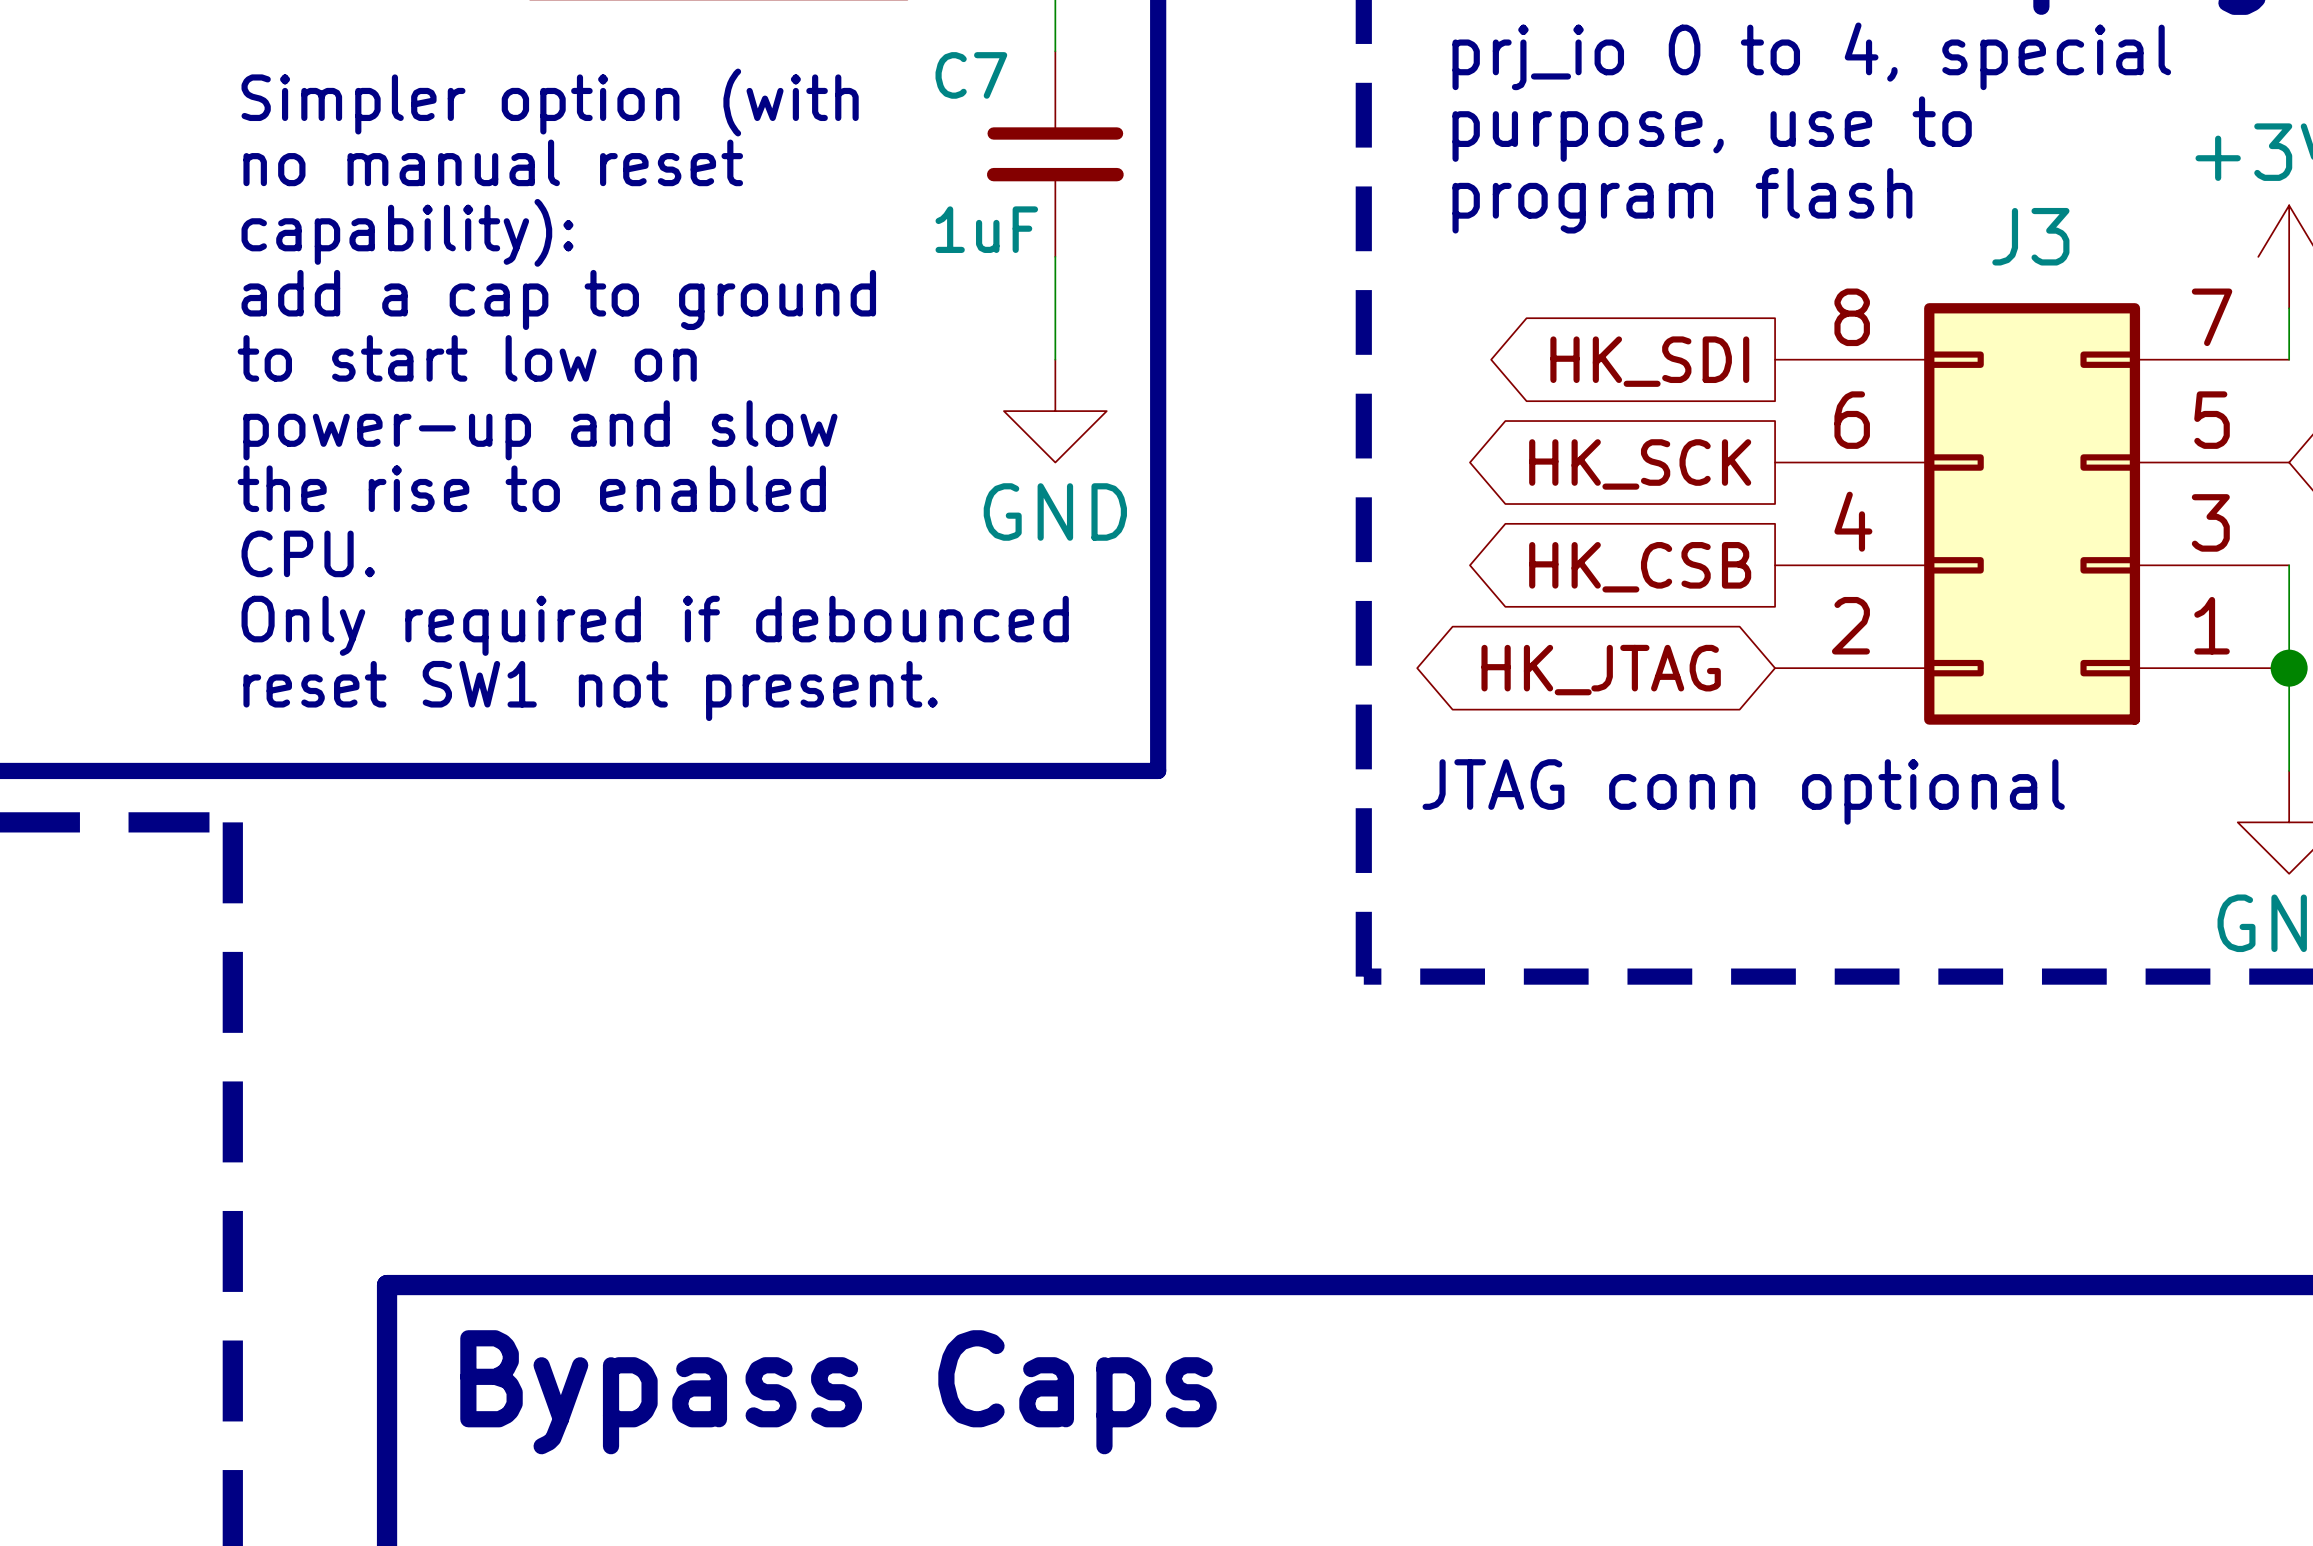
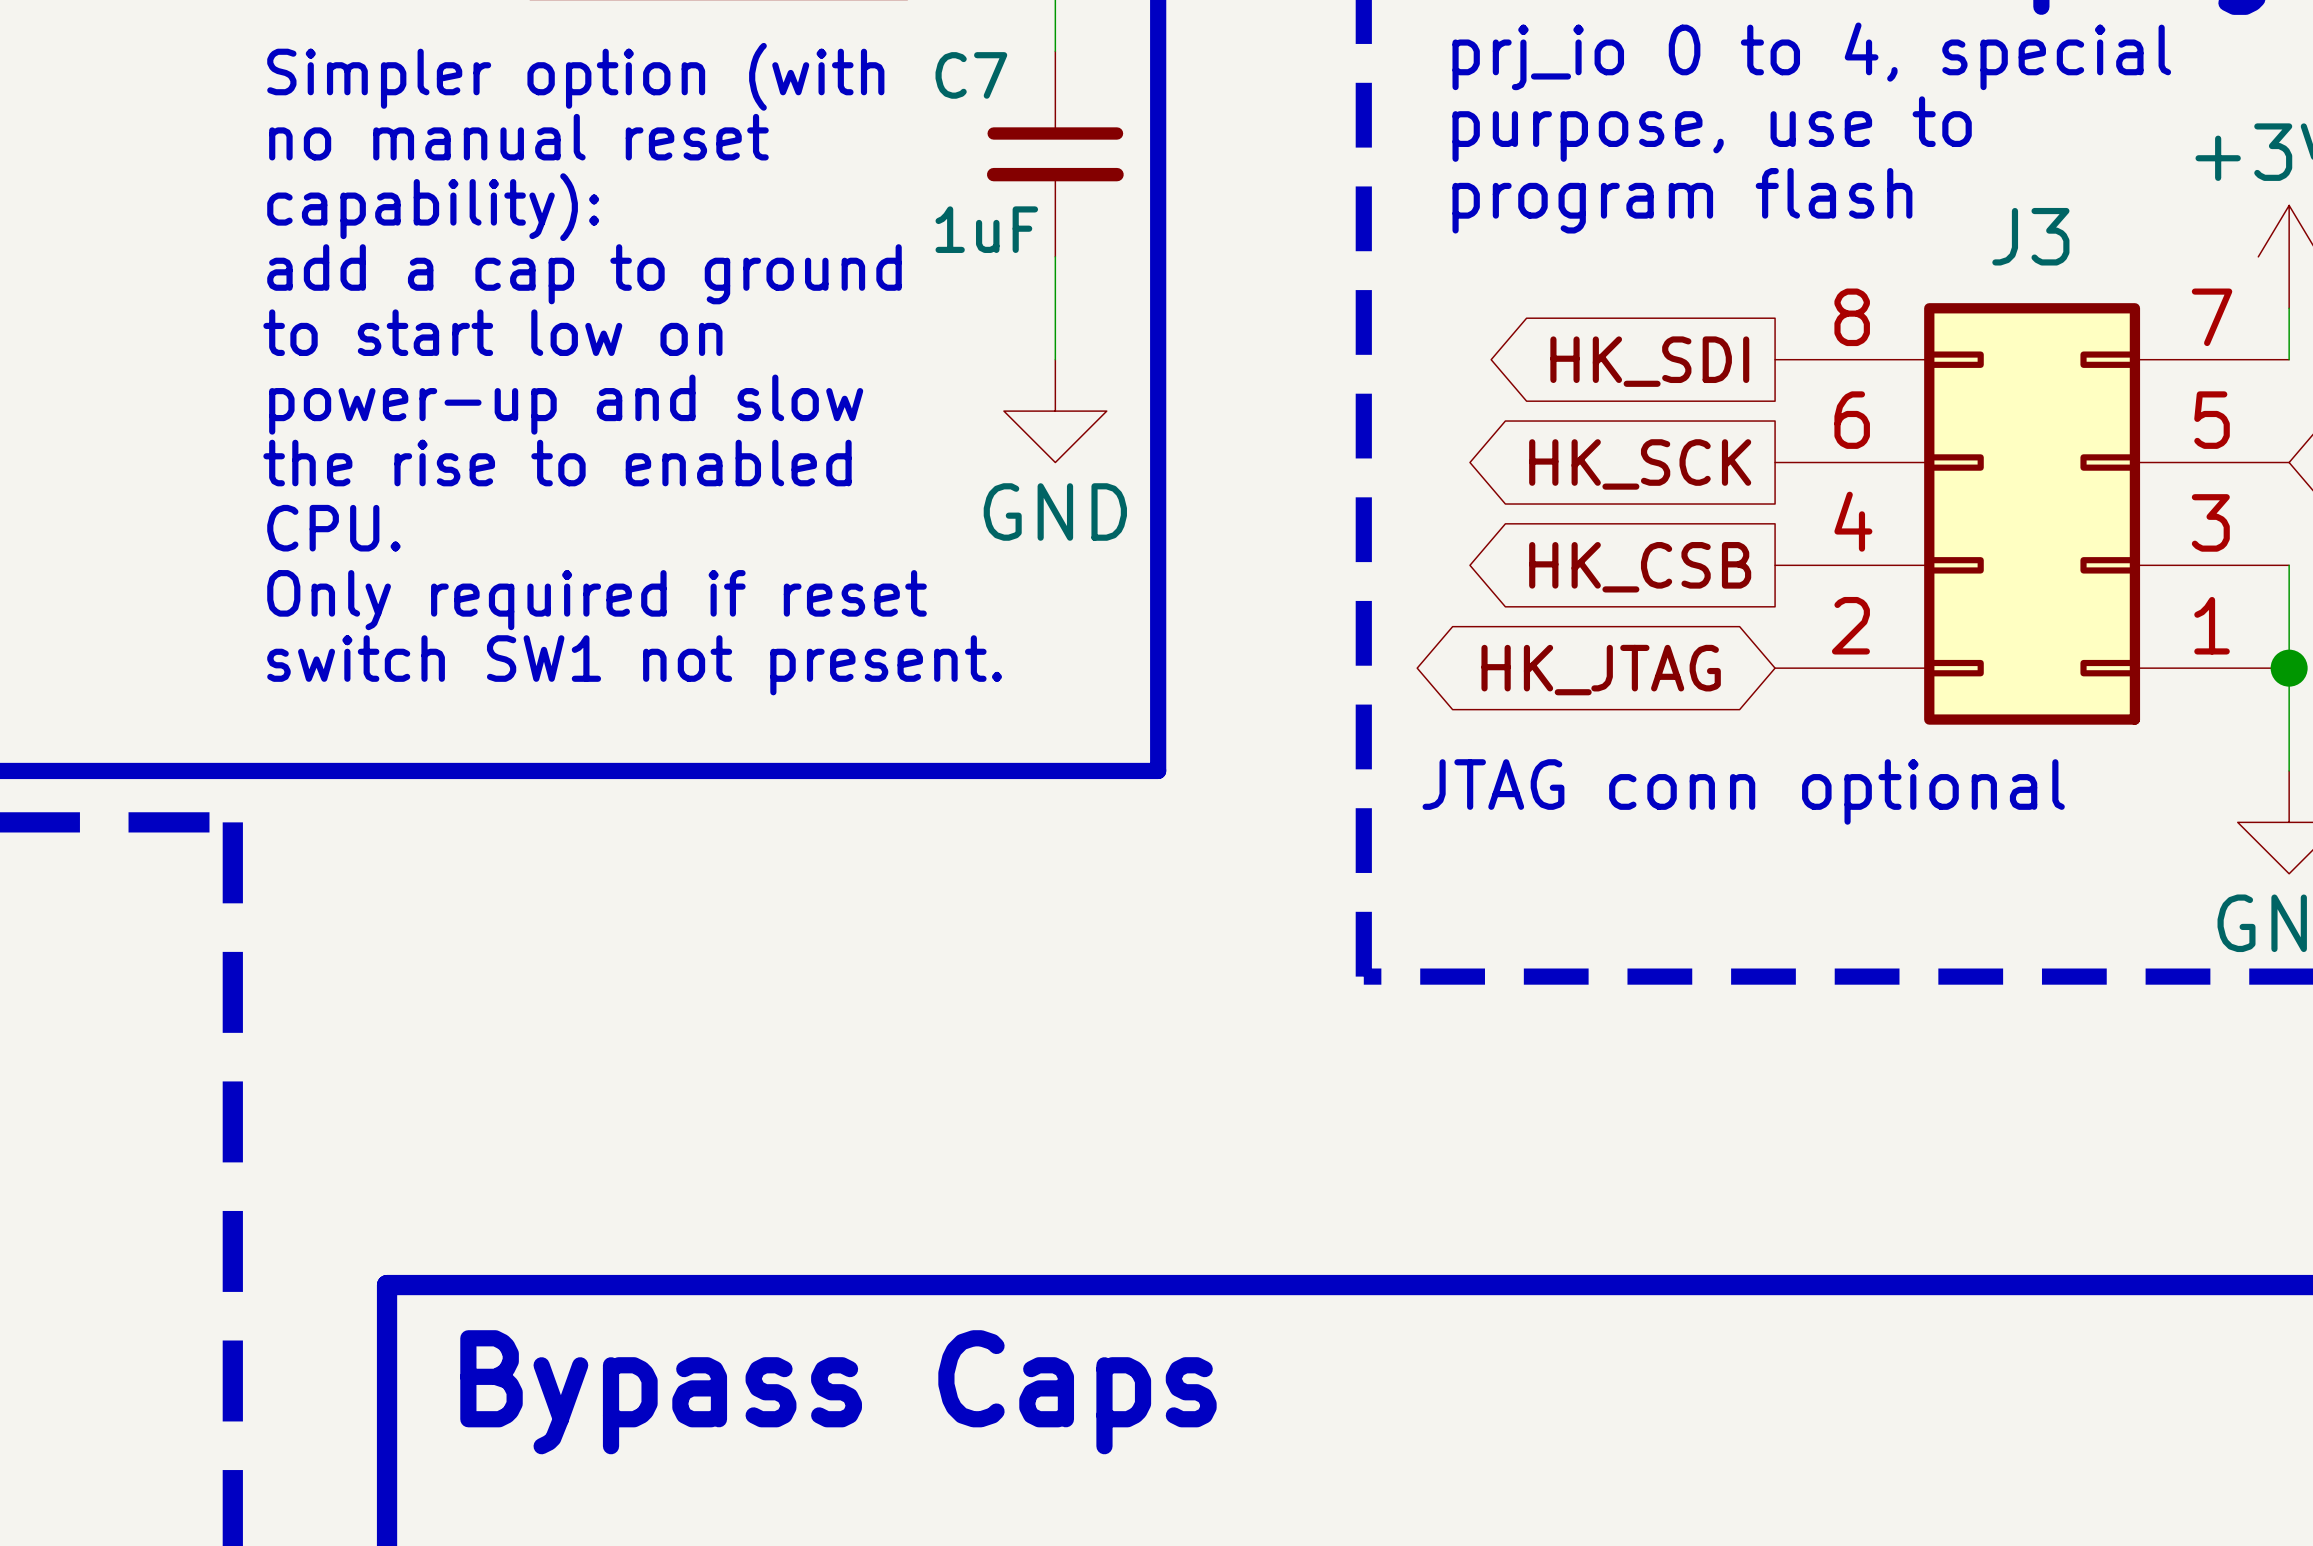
text position: Simpler option (with (550, 102) -> Simpler option (with (575, 76)
text position: no manual reset (493, 162) -> no manual reset (518, 137)
text position: capability): (407, 232) -> capability): (433, 207)
text position: add a cap to ground (558, 299) -> add a cap to ground (584, 274)
text position: to start low on (467, 358) -> to start low on (492, 332)
text position: power-up and slow (540, 430) -> power-up and slow (566, 404)
text position: the rise to enabled (531, 488) -> the rise to enabled (557, 463)
text position: CPU. (308, 553) -> CPU. (333, 528)
text: Only required if debounced (655, 625) -> Only required if reset (597, 600)
text: reset SW1 not present. (590, 690) -> switch SW1 not present. (634, 665)

